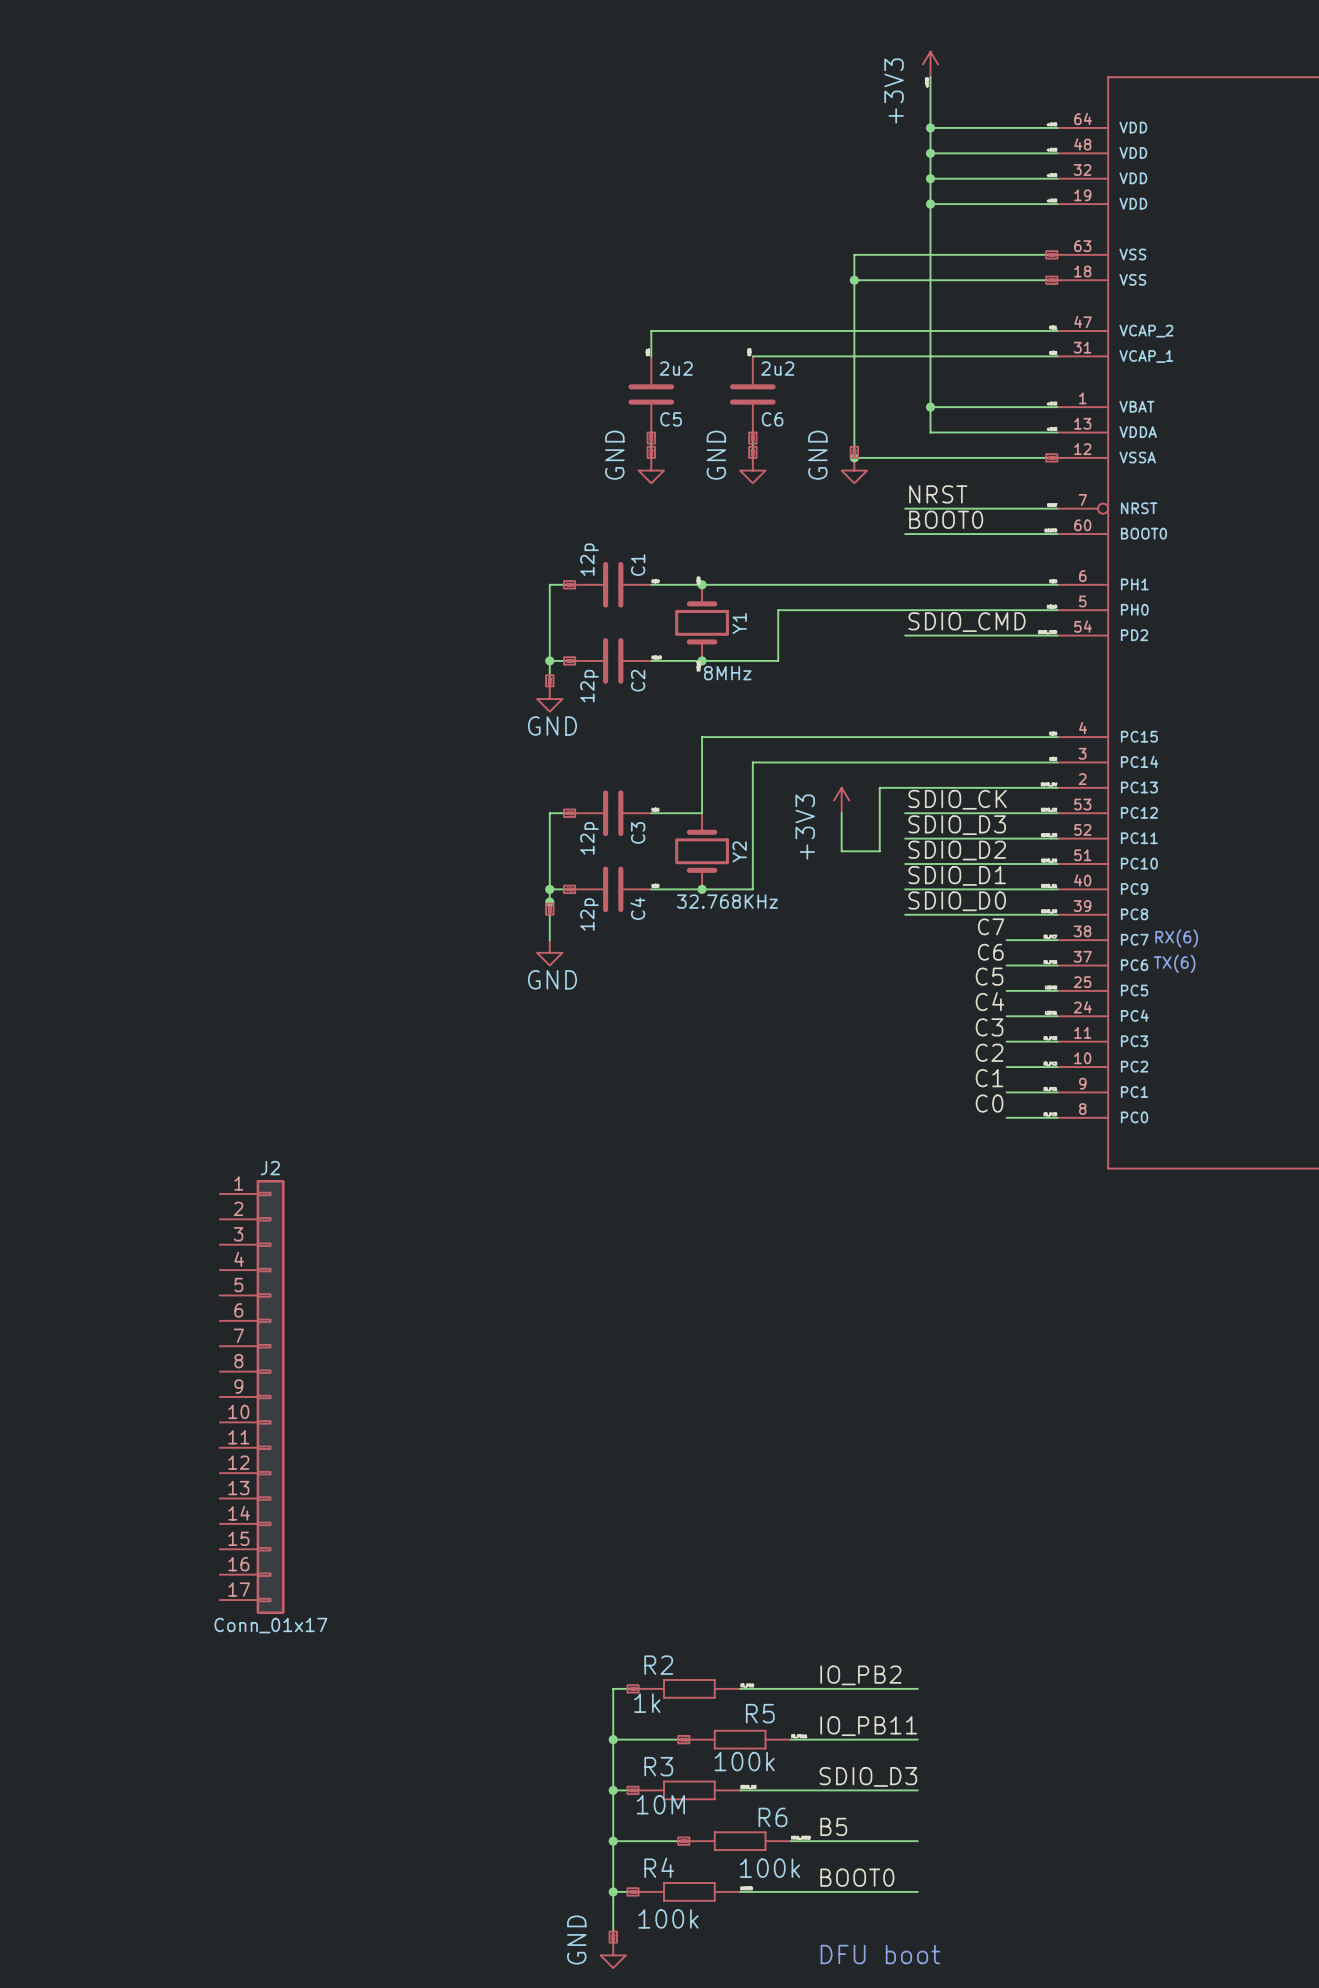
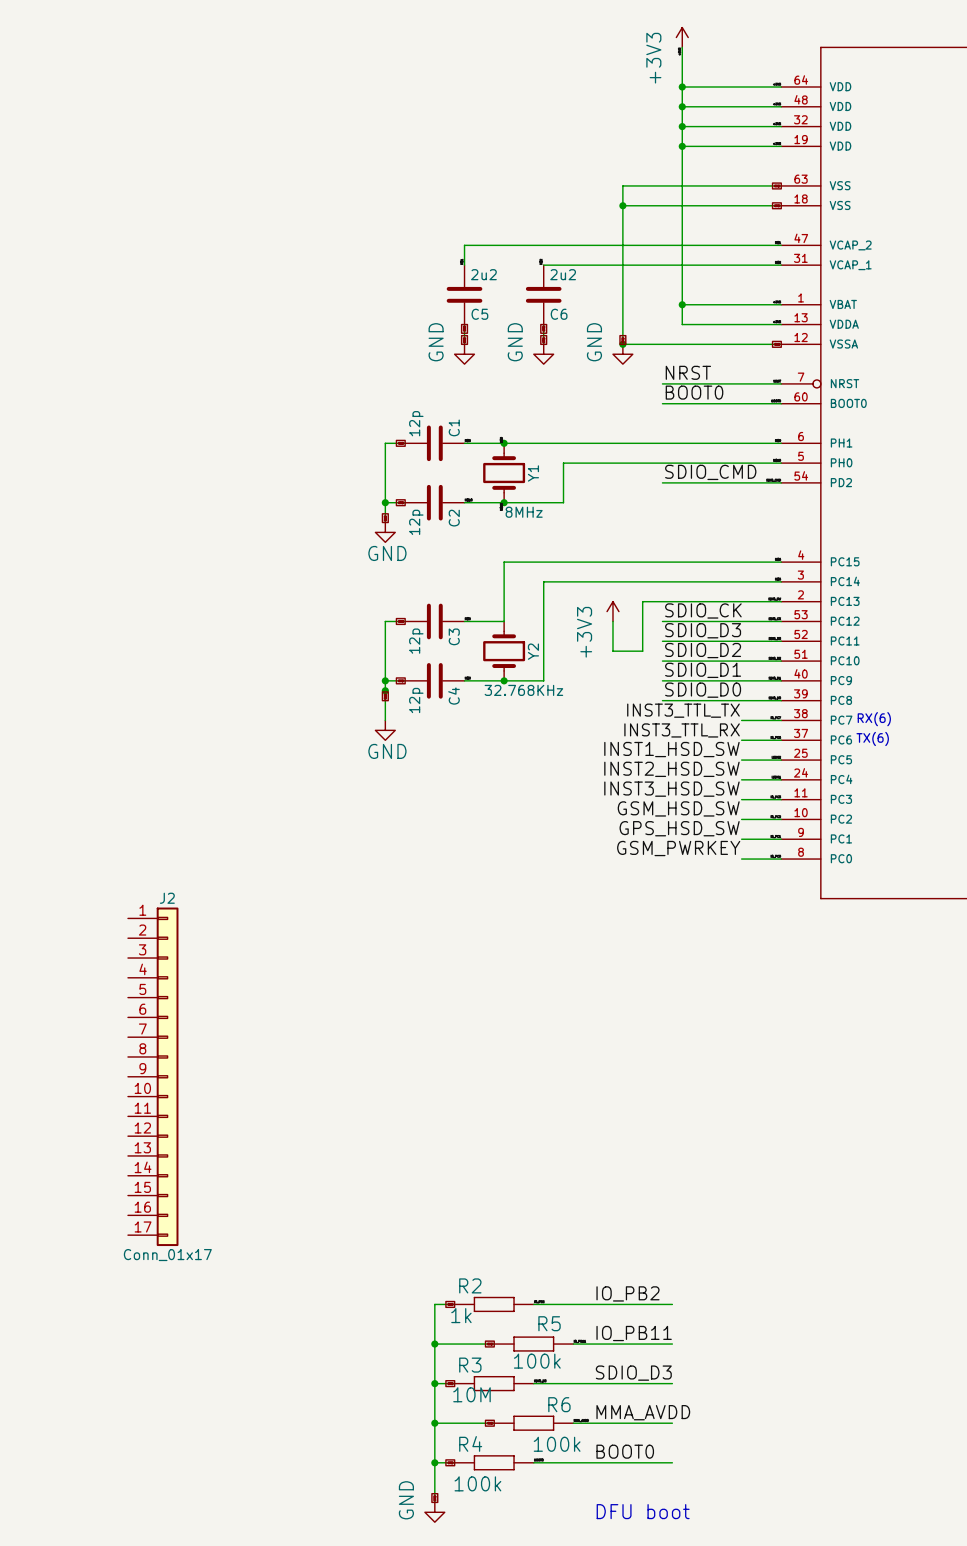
label: C7 (991, 926) -> INST3_TTL_TX (683, 710)
label: C6 (990, 952) -> INST3_TTL_RX (682, 730)
label: C5 (989, 976) -> INST1_HSD_SW (671, 749)
label: C4 (989, 1001) -> INST2_HSD_SW (671, 769)
label: C3 (989, 1027) -> INST3_HSD_SW (671, 789)
label: C2 (989, 1052) -> GSM_HSD_SW (678, 808)
label: C1 (989, 1078) -> GPS_HSD_SW (679, 828)
label: C0 (989, 1103) -> GSM_PWRKEY (678, 848)
label: B5 (833, 1826) -> MMA_AVDD (643, 1412)

